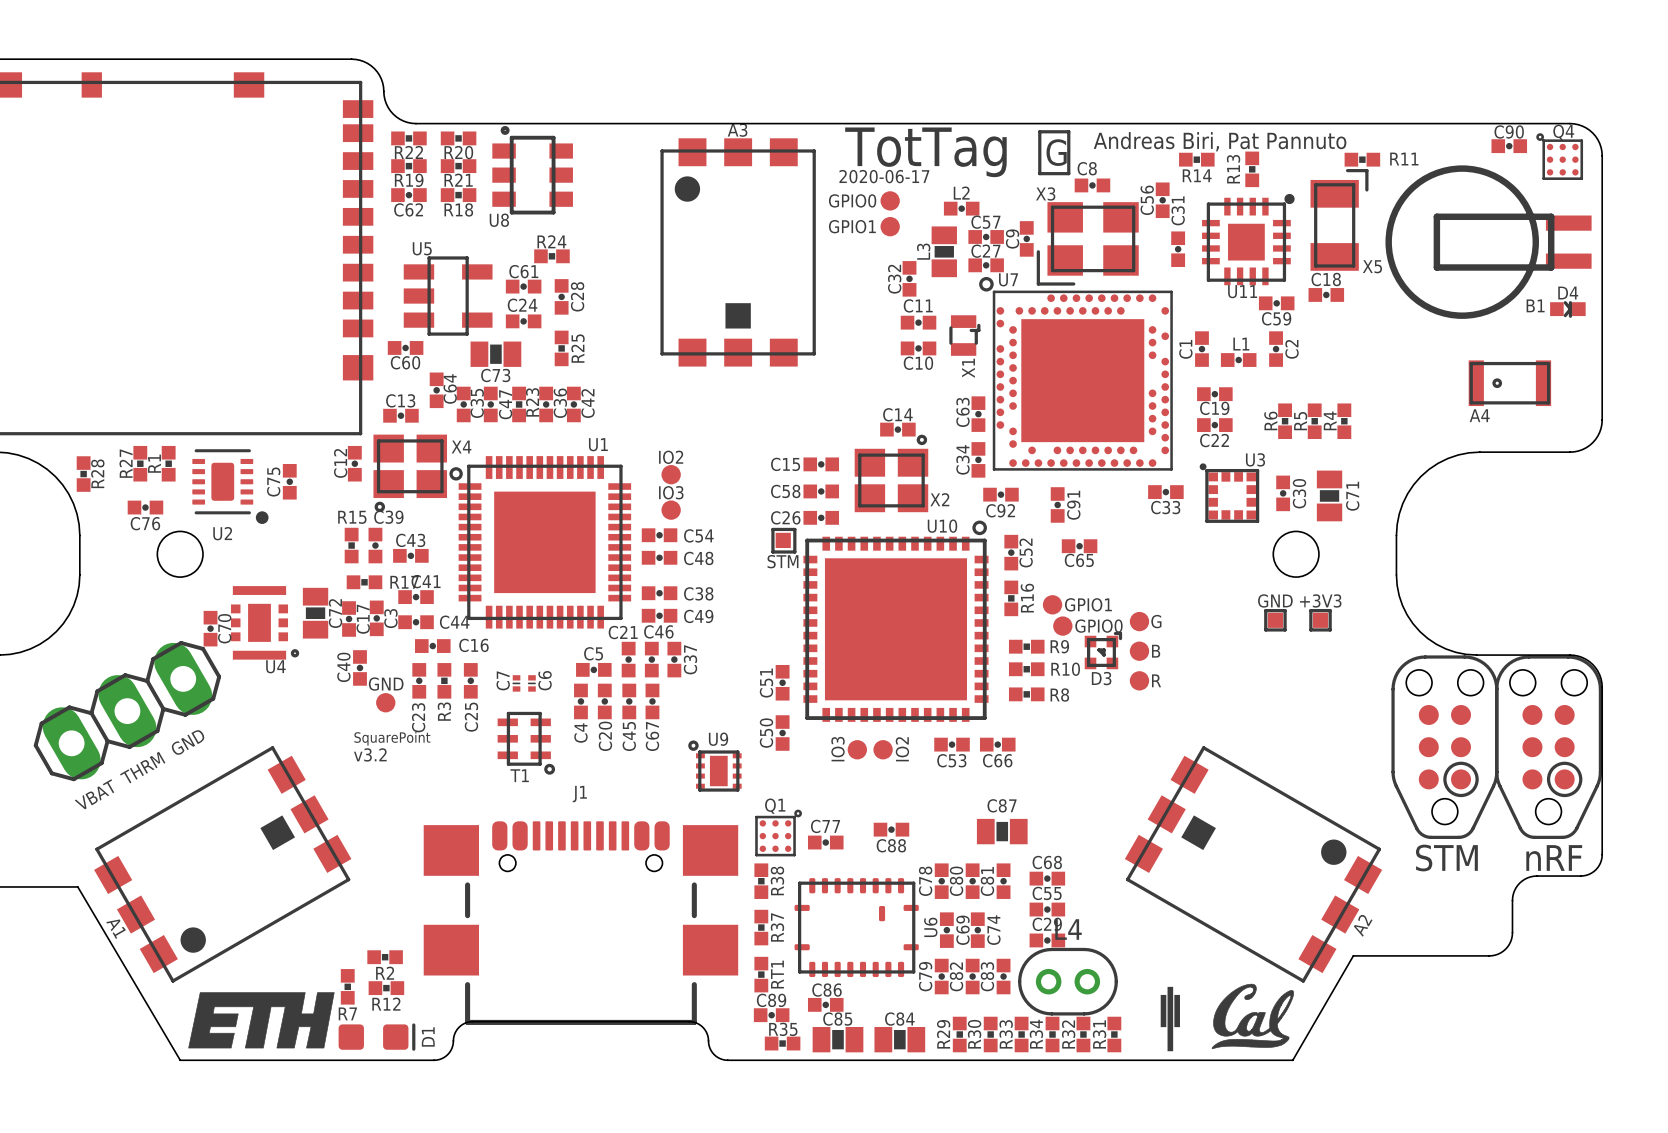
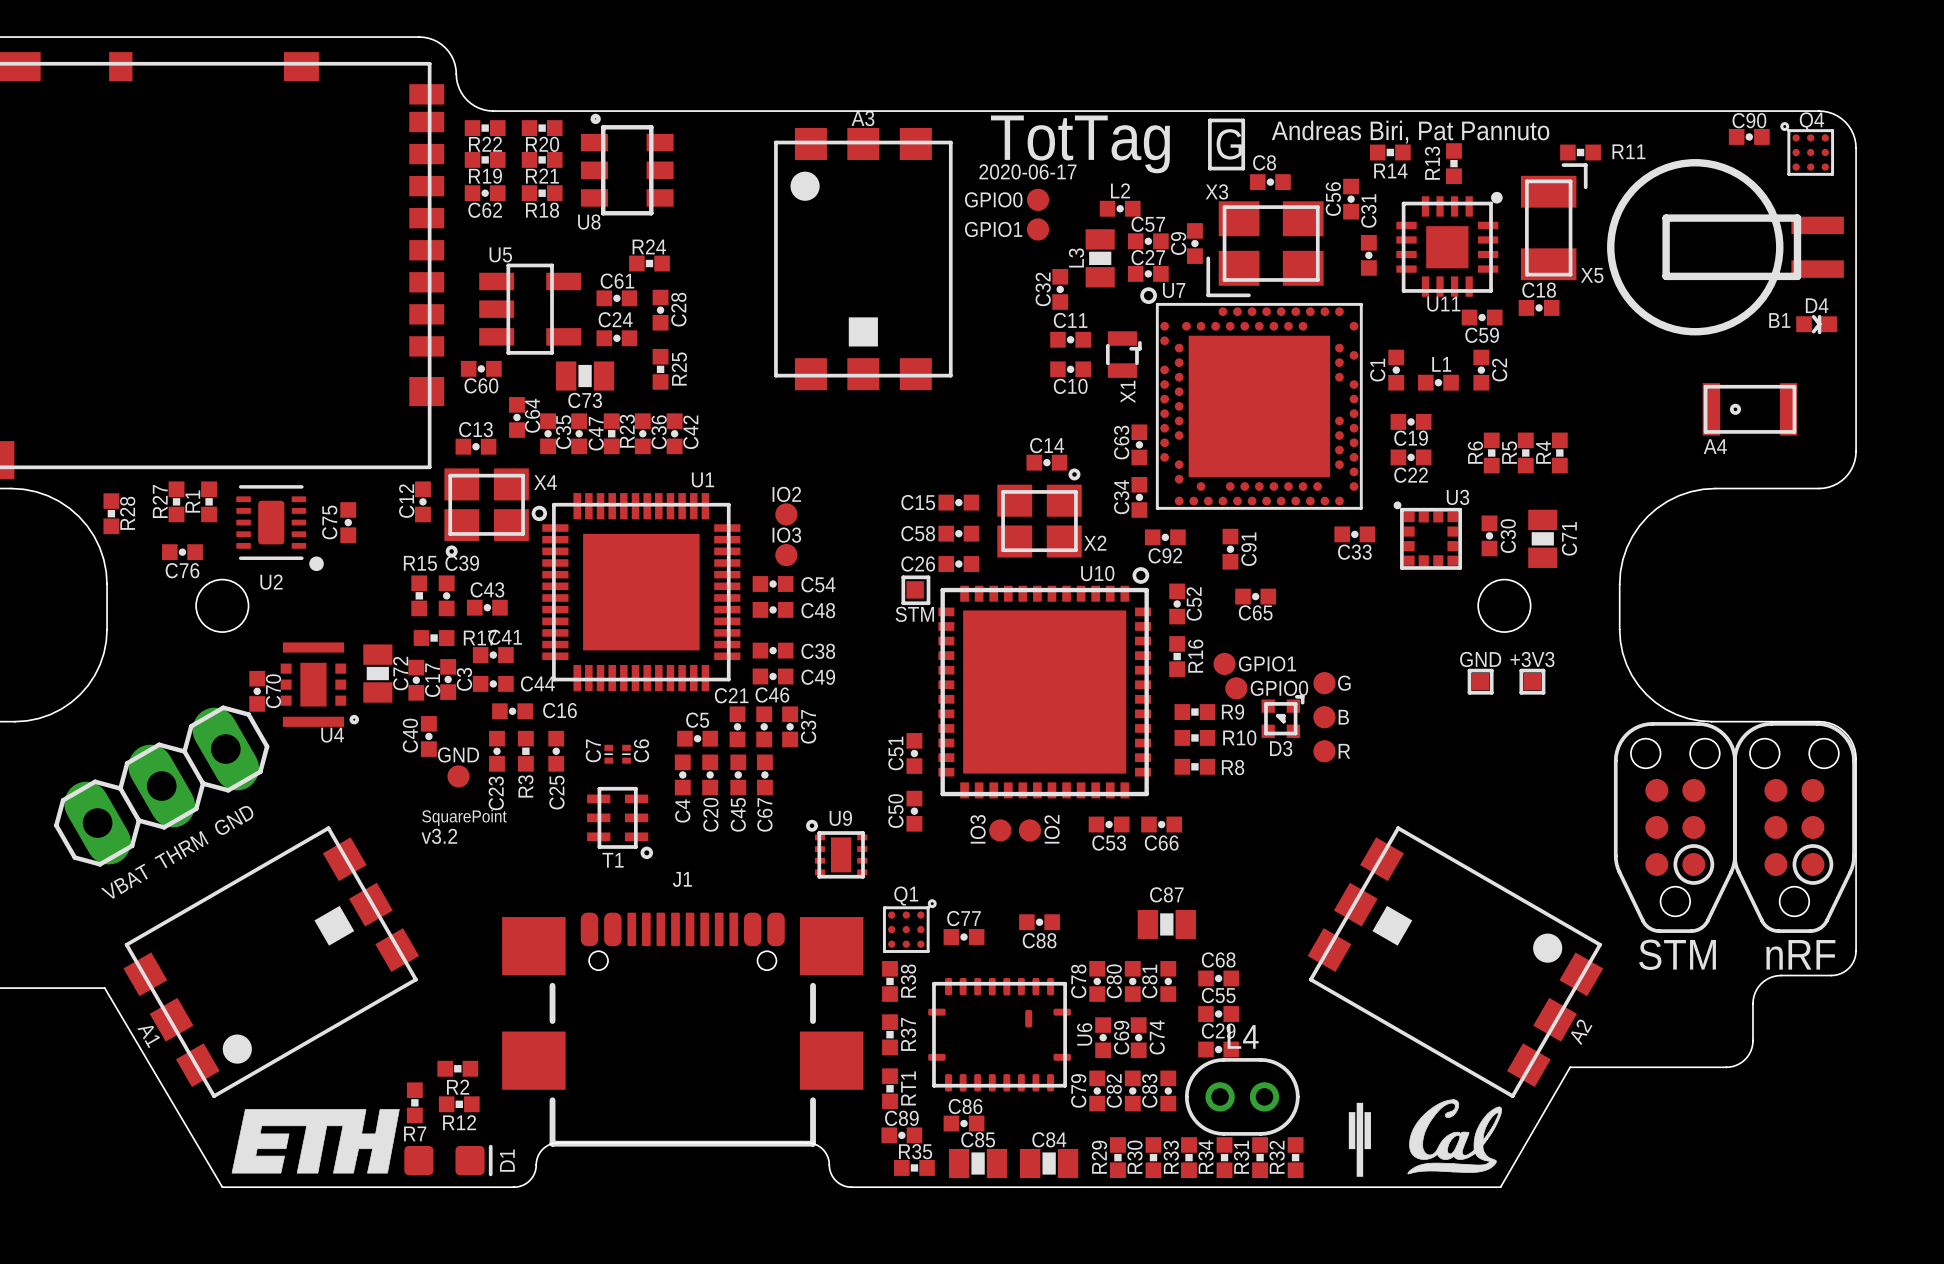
R32 name: R32 (1068, 1034) -> R31 (1241, 1157)
R31 name: R31 (1099, 1034) -> R32 (1277, 1157)

